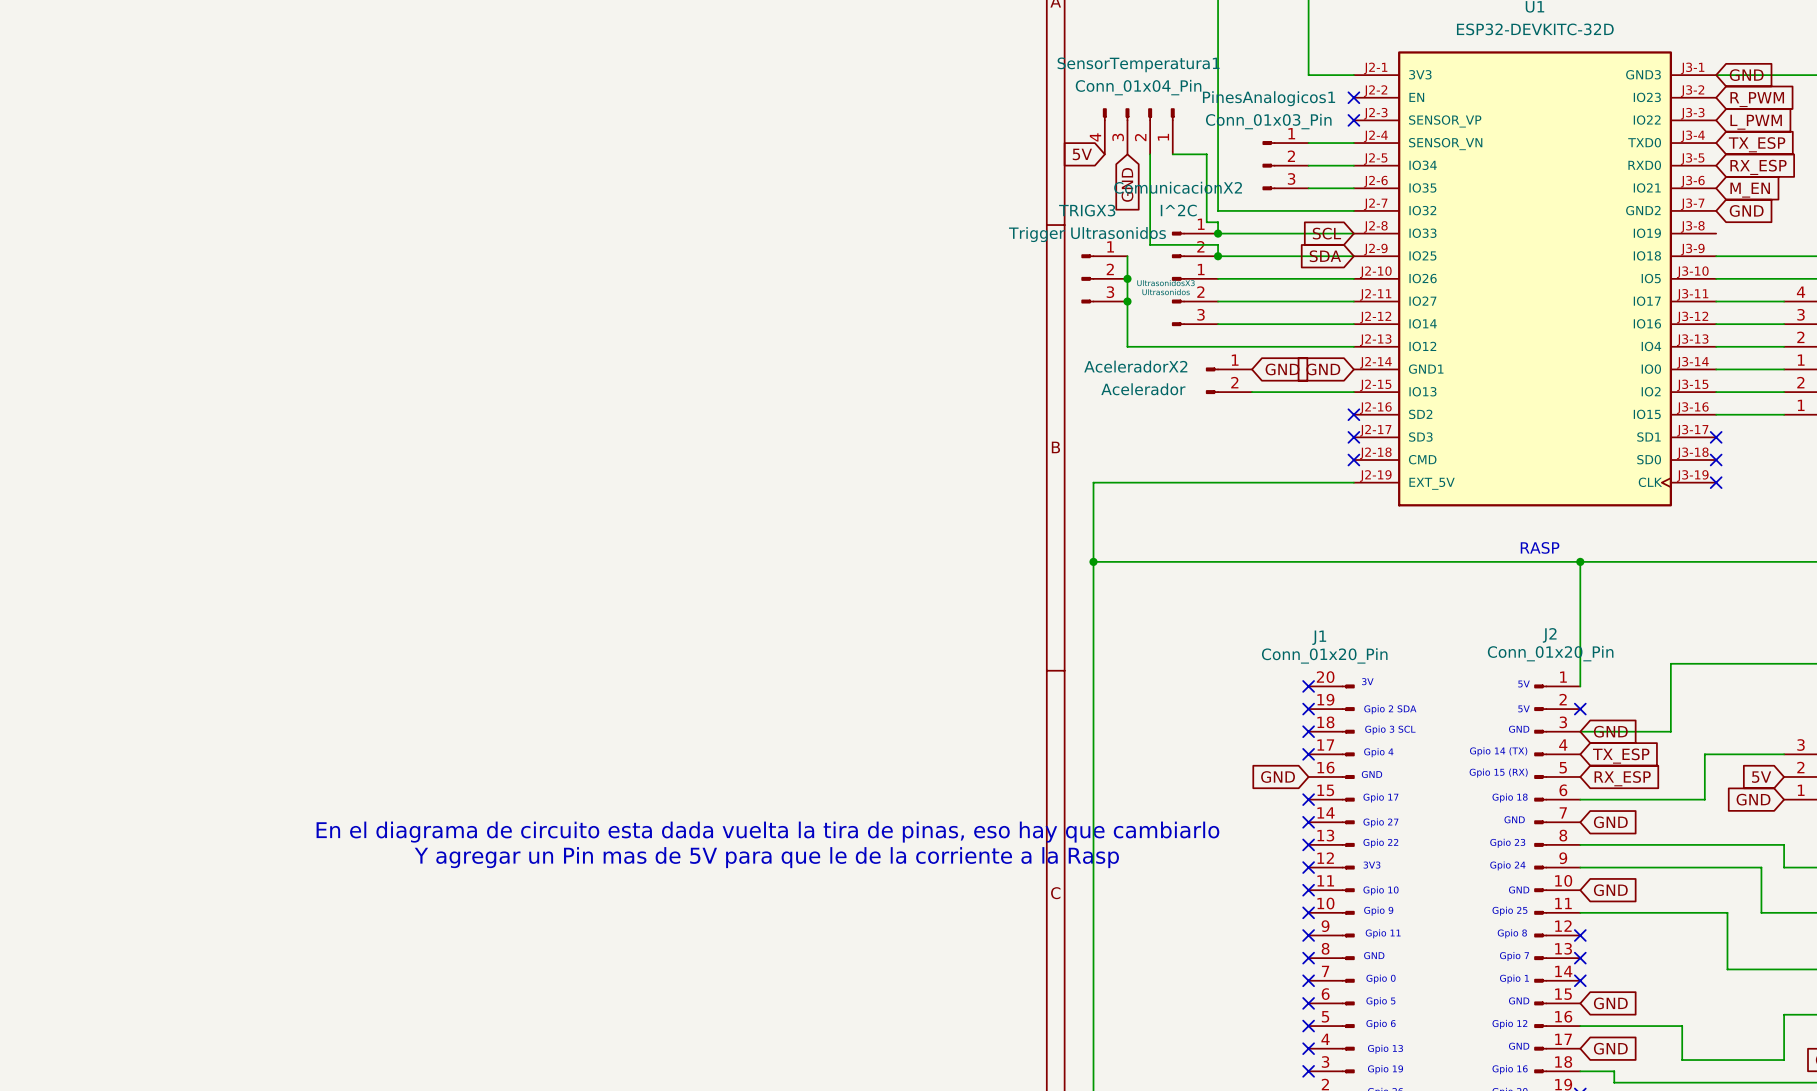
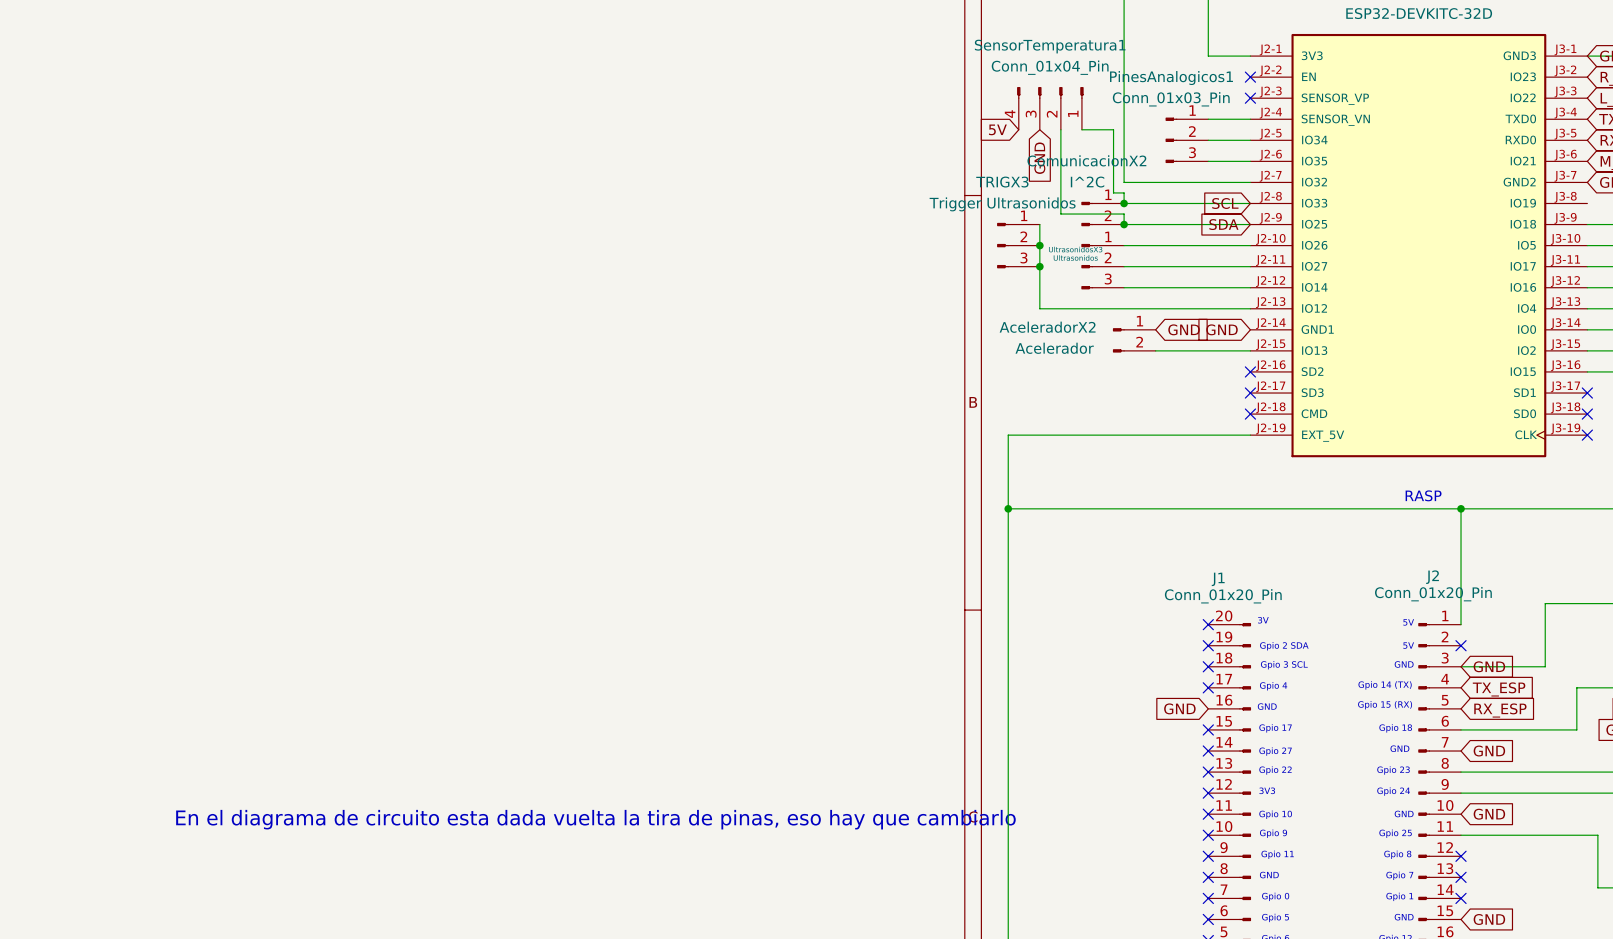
text position: En el diagrama de circuito esta dada vuelta la tira de pinas, eso hay que cambiarlo (767, 832) -> En el diagrama de circuito esta dada vuelta la tira de pinas, eso hay que cambiarlo (595, 819)
text: Y agregar un Pin mas de 5V para que le de la corriente a la Rasp (766, 857) -> none

